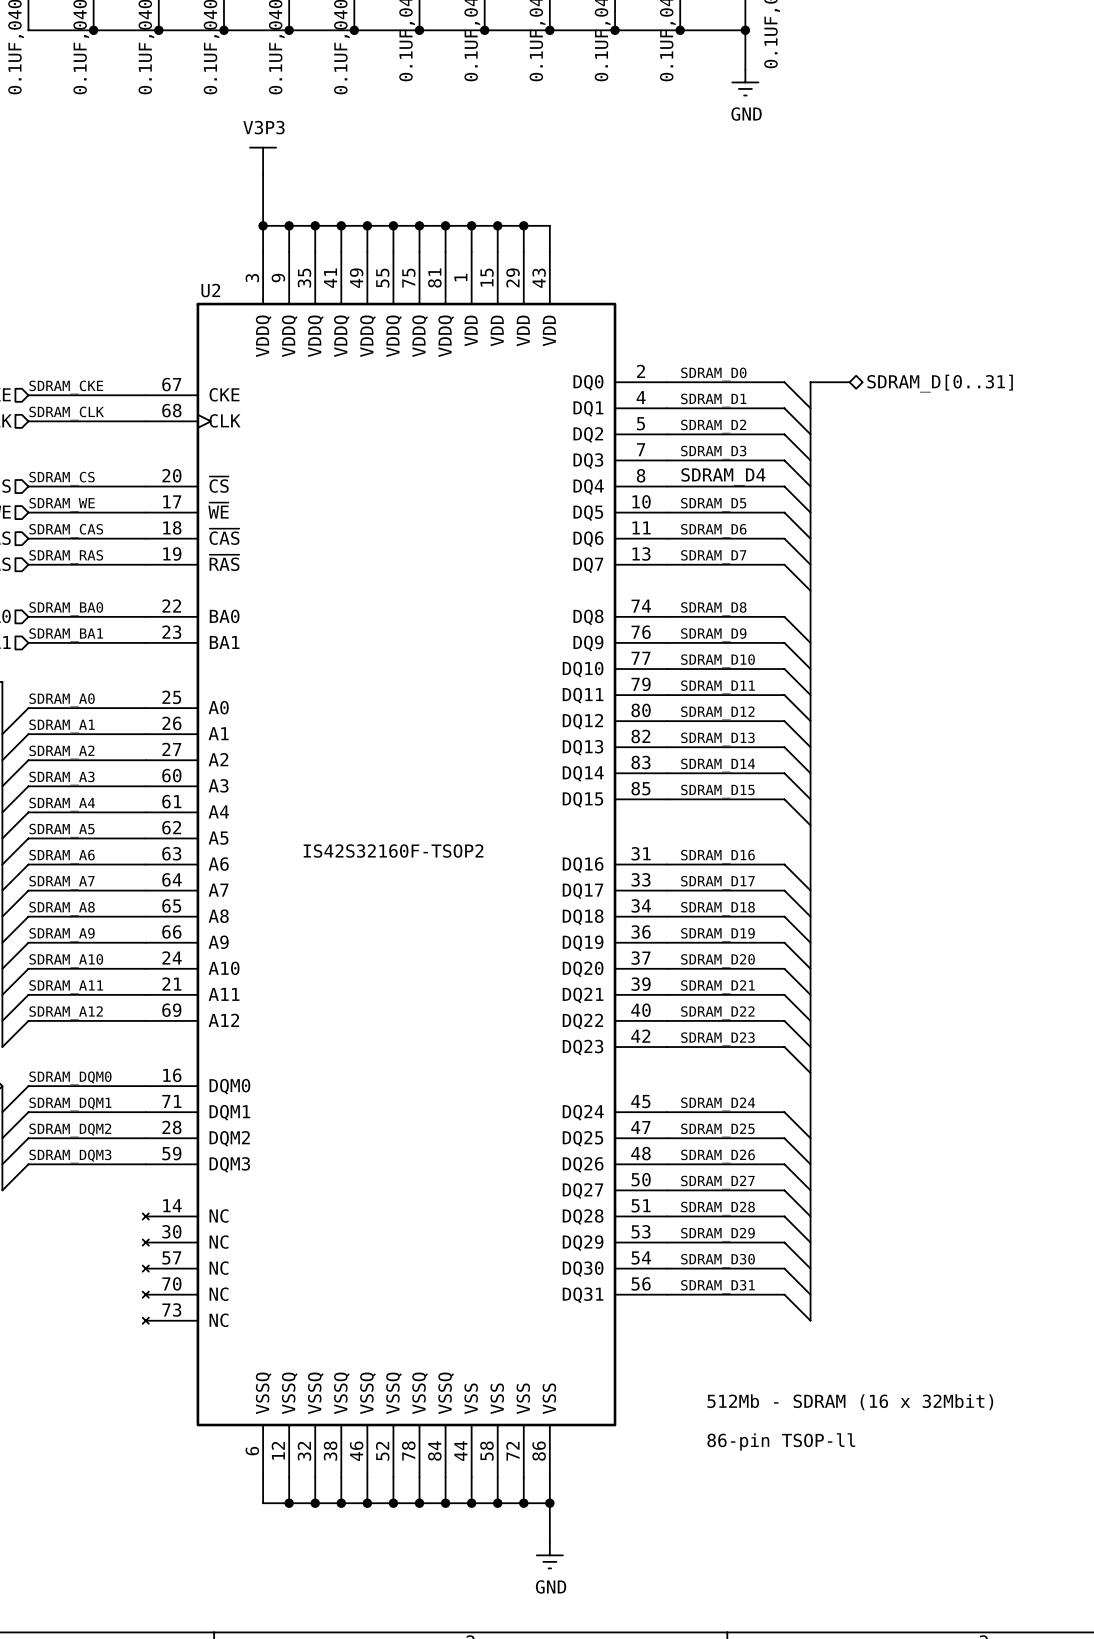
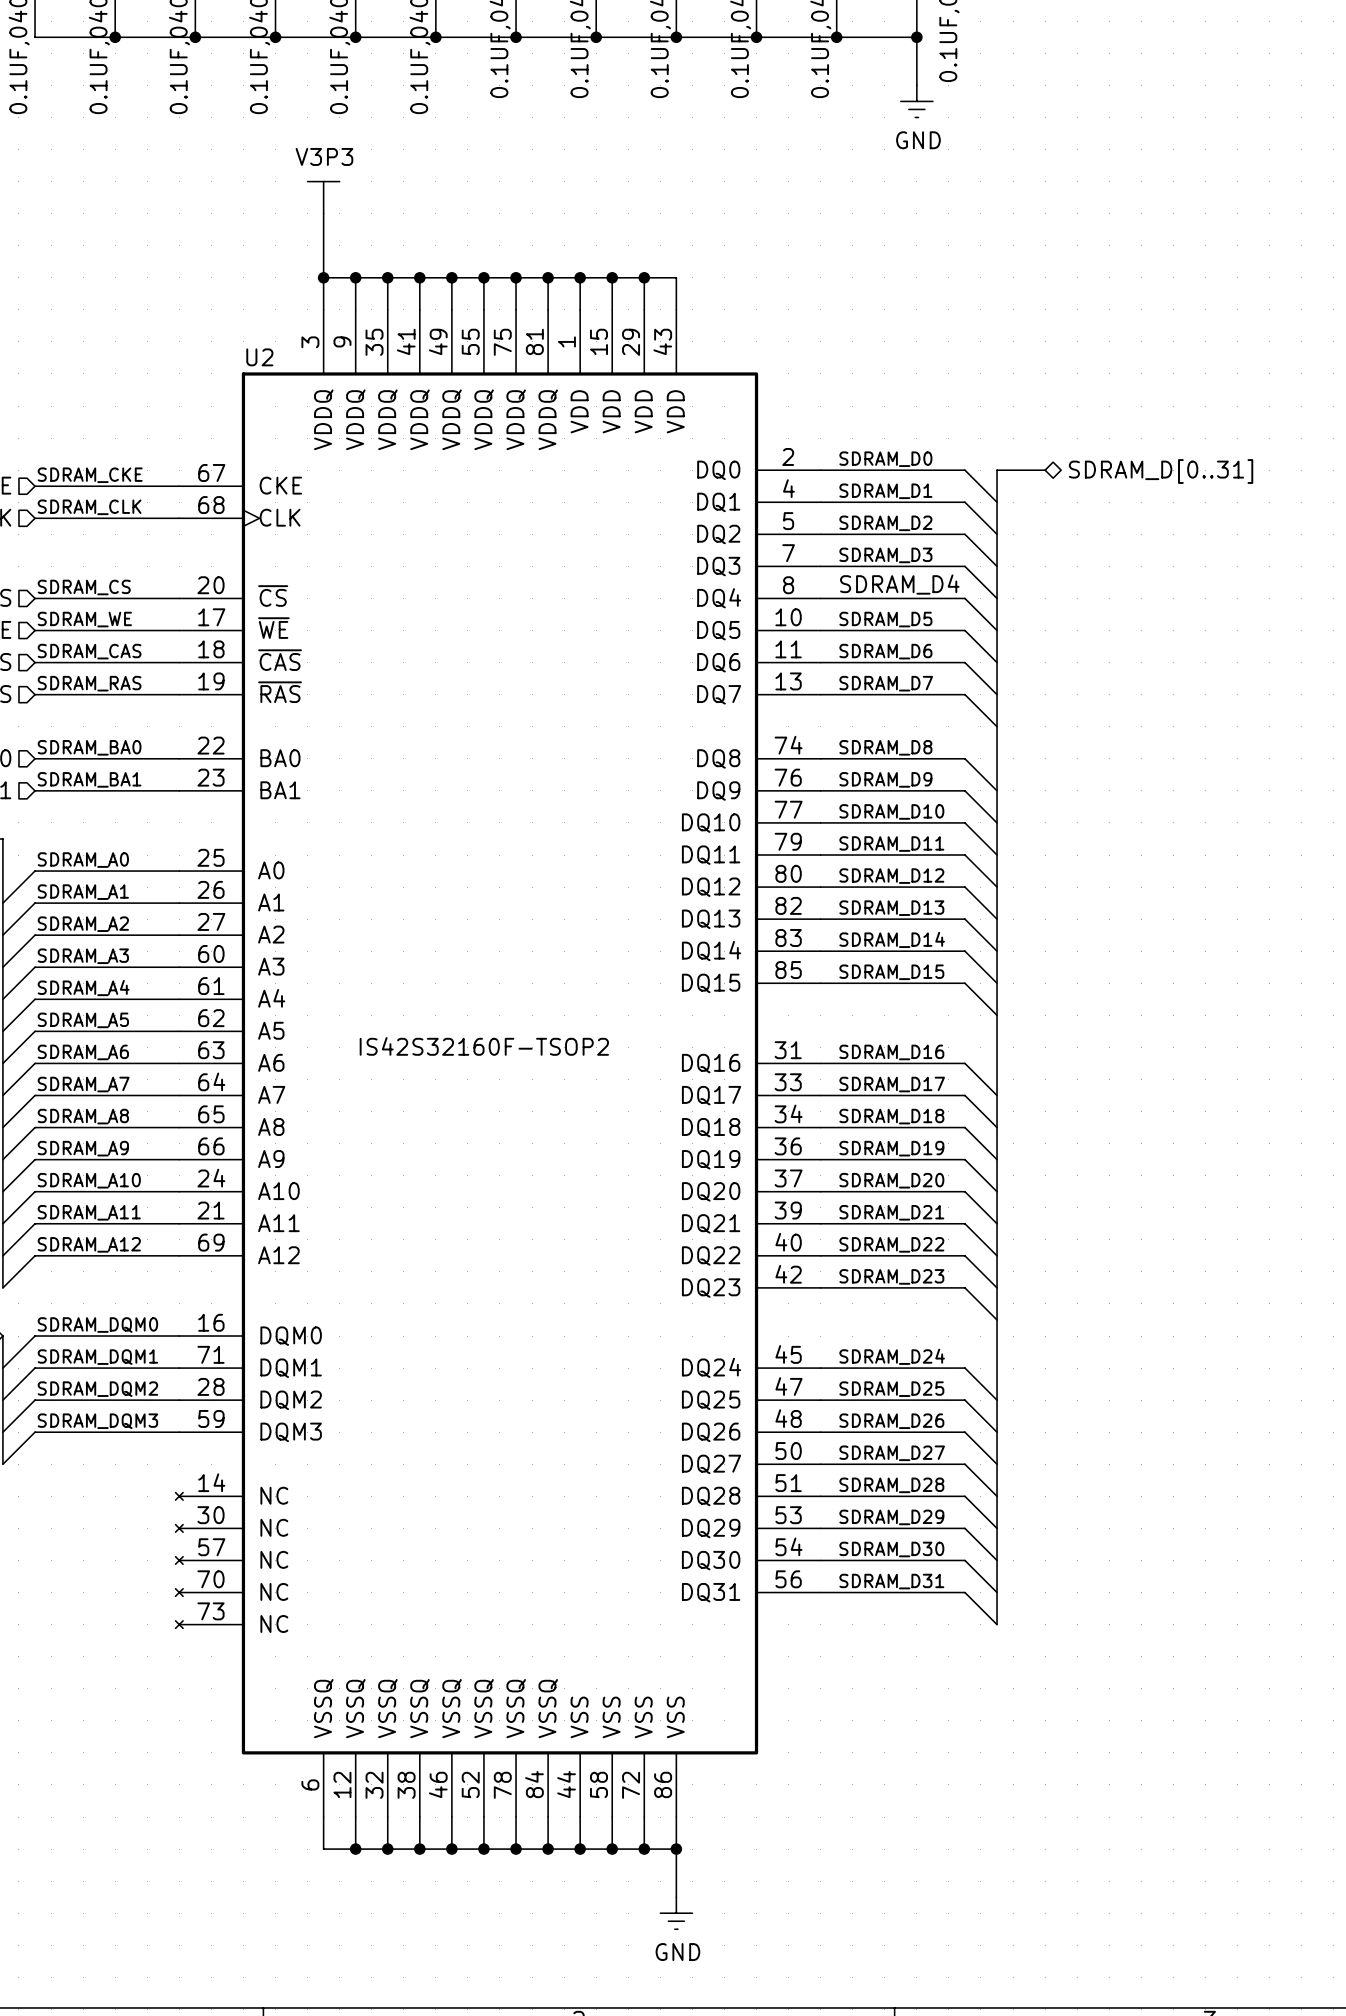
text: 512Mb - SDRAM (16 x 32Mbit) (850, 1402) -> none
text: 86-pin TSOP-ll (781, 1441) -> none

